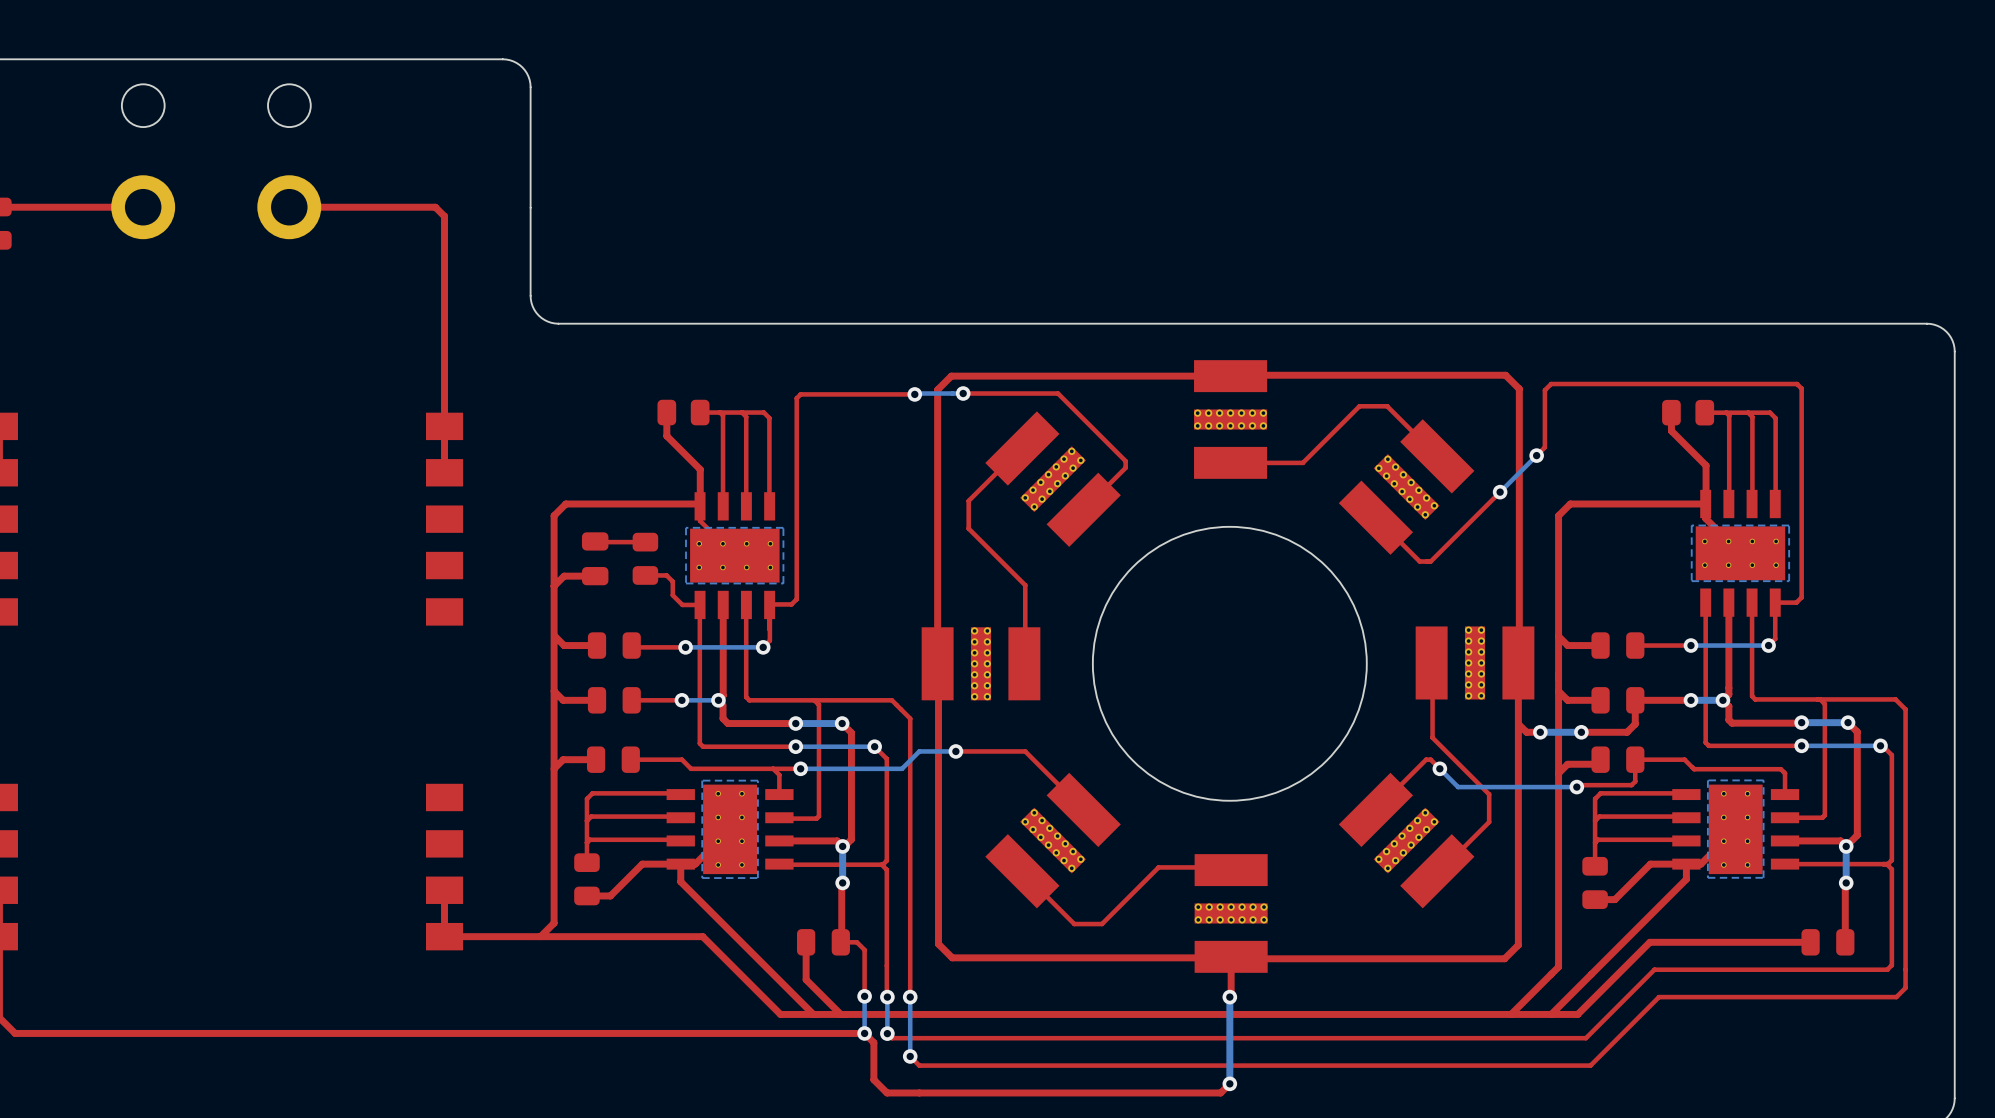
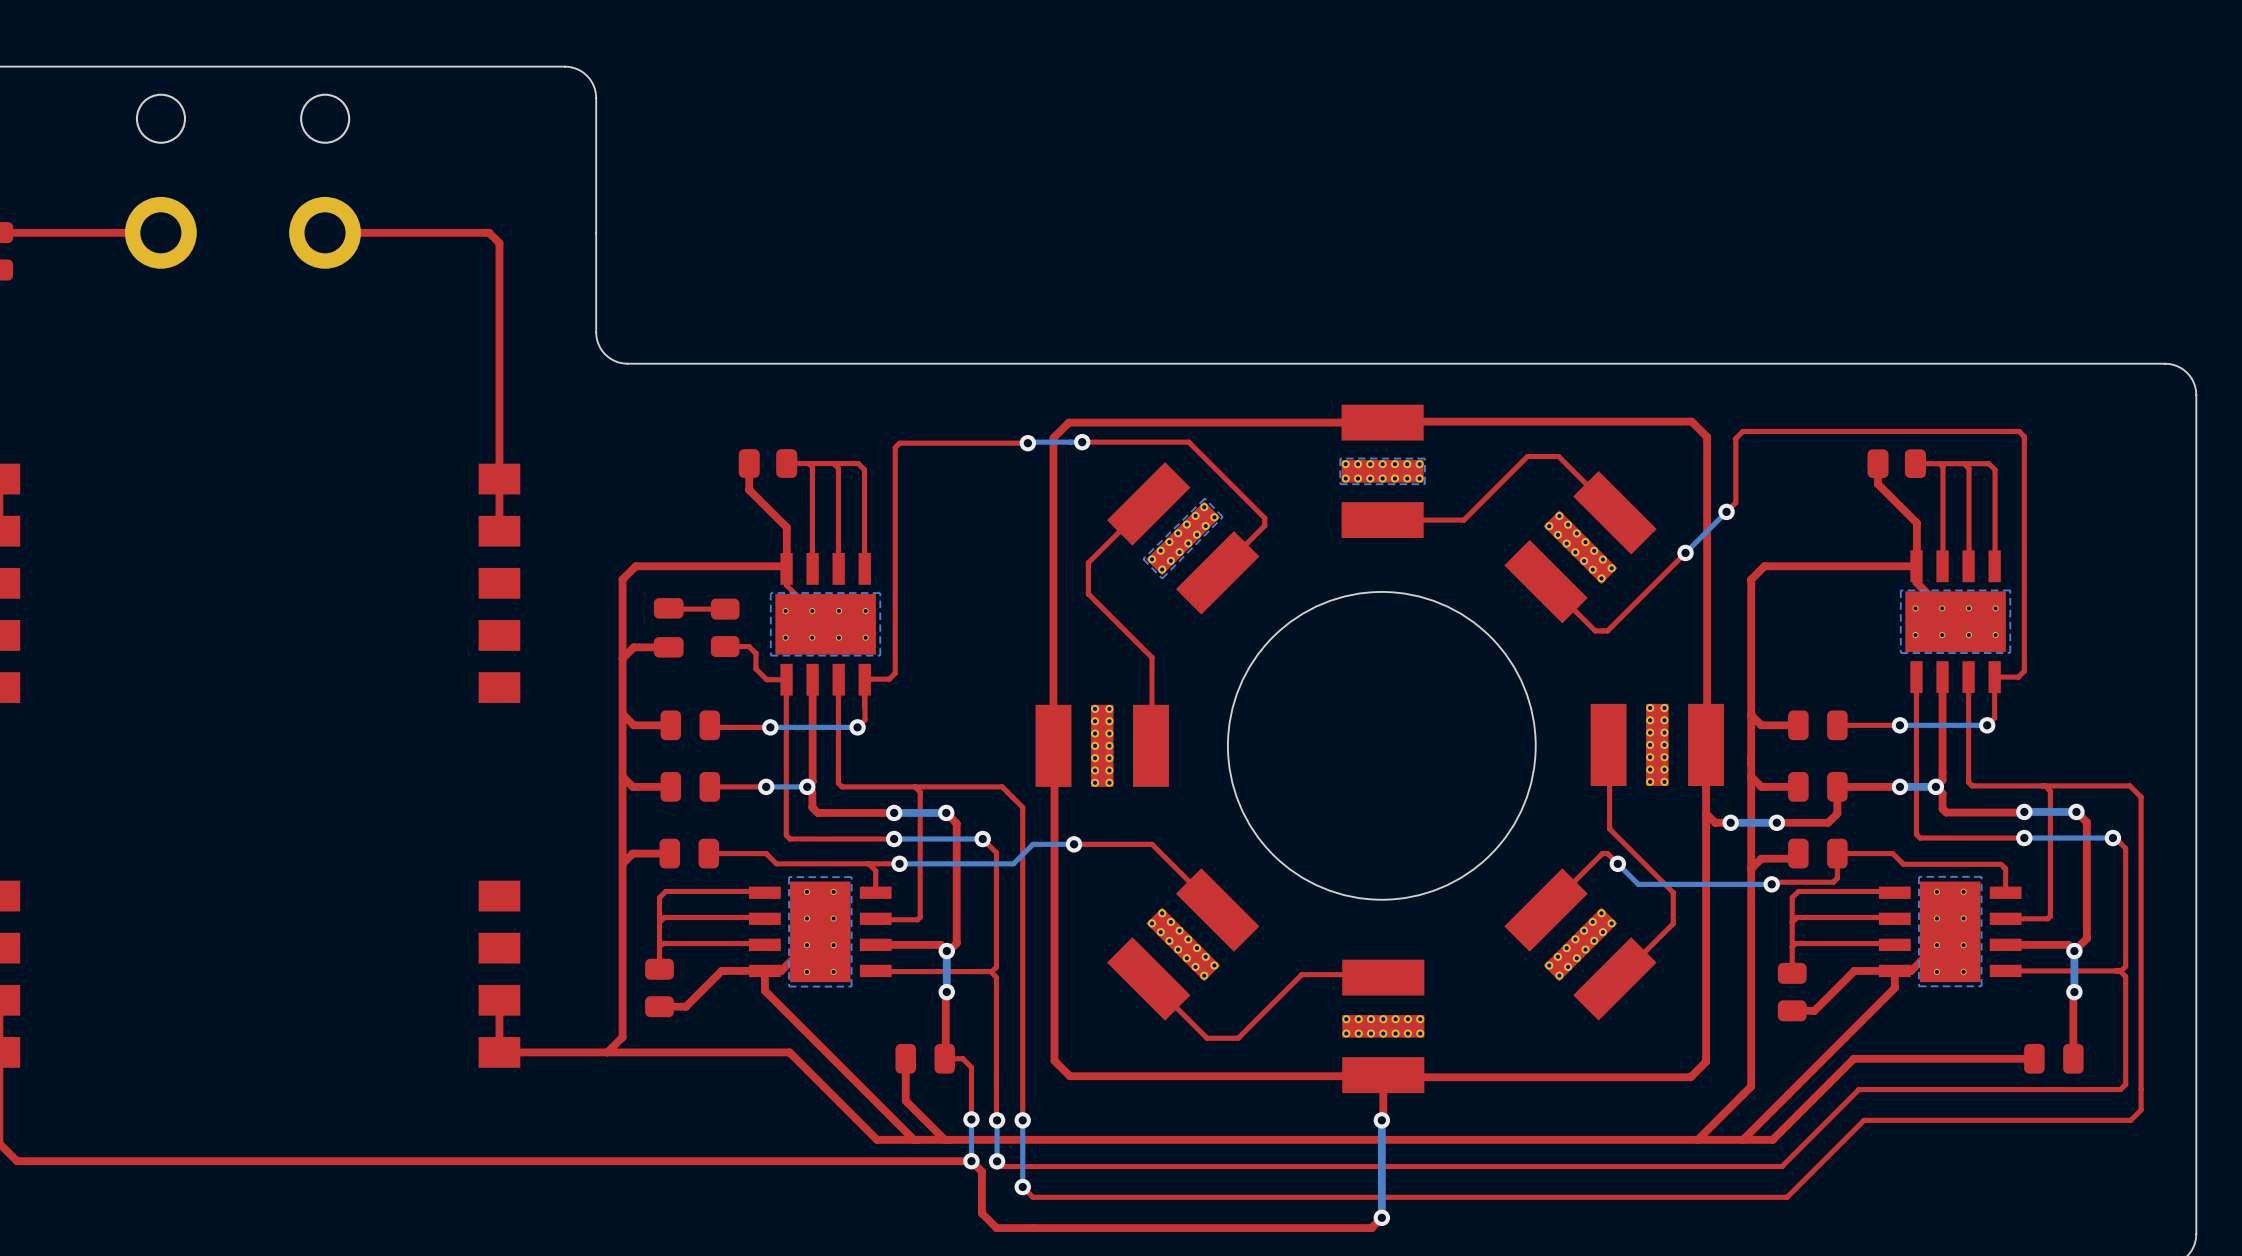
bottom zone outline: none -> (1424, 458) (1424, 484) (1340, 484) (1340, 458) (1424, 458)
bottom zone outline: none -> (1204, 498) (1222, 517) (1162, 578) (1143, 559) (1204, 498)

